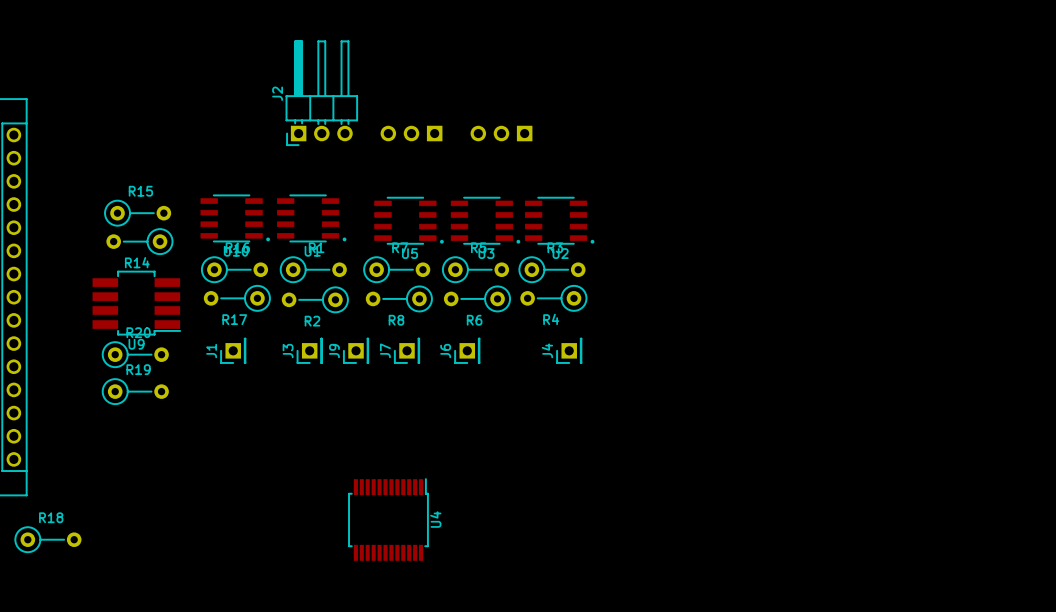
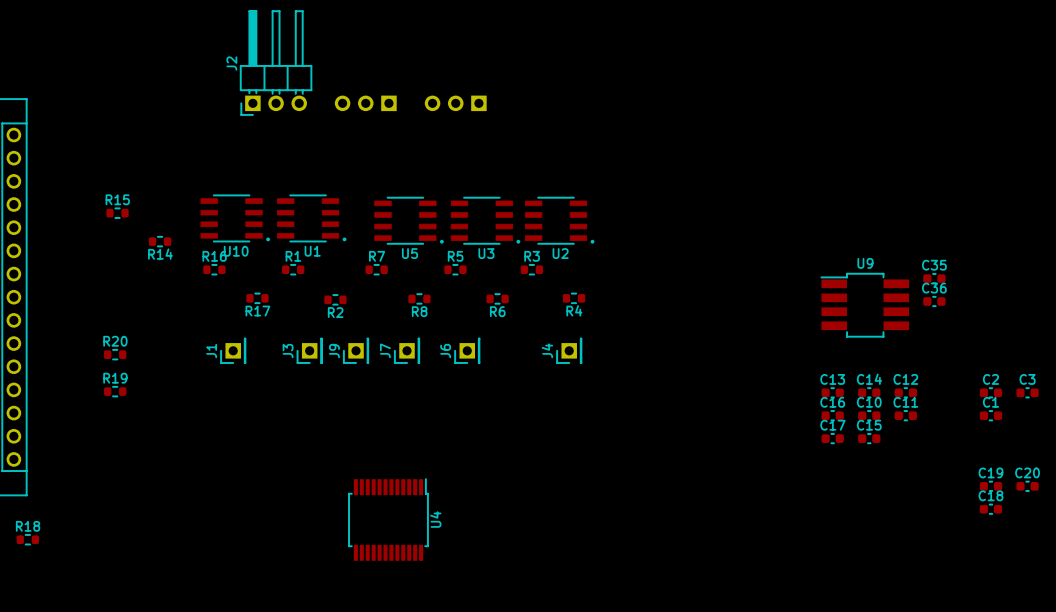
J2 position: (321, 93) -> (276, 63)
part: none -> (365, 103)
part: none -> (455, 103)
part: (411, 133) -> none
part: (501, 133) -> none
R15 footprint: [104, 200, 172, 227] -> [106, 207, 129, 219]
R14 footprint: [106, 228, 174, 255] -> [148, 236, 172, 247]
R16 footprint: [201, 256, 269, 283] -> [203, 264, 226, 276]
R1 footprint: [280, 256, 347, 283] -> [282, 264, 305, 276]
R7 footprint: [363, 256, 431, 283] -> [365, 264, 388, 276]
R5 footprint: [442, 256, 510, 283] -> [444, 264, 467, 276]
R3 footprint: [518, 256, 586, 283] -> [520, 264, 544, 276]
C35: none -> (934, 278)
R17 footprint: [203, 285, 271, 312] -> [246, 293, 269, 304]
R8 footprint: [365, 285, 433, 312] -> [408, 293, 431, 305]
R6 footprint: [443, 285, 511, 312] -> [486, 293, 509, 305]
R4 footprint: [520, 285, 588, 312] -> [562, 293, 586, 304]
R2 footprint: [281, 286, 349, 313] -> [324, 294, 347, 306]
C36: none -> (934, 301)
U9 rotation: 0° (136, 303) -> 180° (864, 305)
U9 position: (136, 303) -> (864, 305)
R20 footprint: [102, 341, 169, 368] -> [104, 349, 127, 360]
R19 footprint: [102, 378, 169, 405] -> [104, 386, 127, 397]
C13: none -> (832, 392)
C14: none -> (869, 392)
C12: none -> (905, 392)
C2: none -> (990, 392)
C3: none -> (1027, 392)
C16: none -> (832, 415)
C10: none -> (869, 415)
C11: none -> (905, 415)
C1: none -> (990, 415)
C17: none -> (832, 438)
C15: none -> (869, 438)
C19: none -> (990, 486)
C20: none -> (1027, 486)
C18: none -> (990, 509)
R18 footprint: [14, 526, 82, 553] -> [16, 534, 40, 546]

